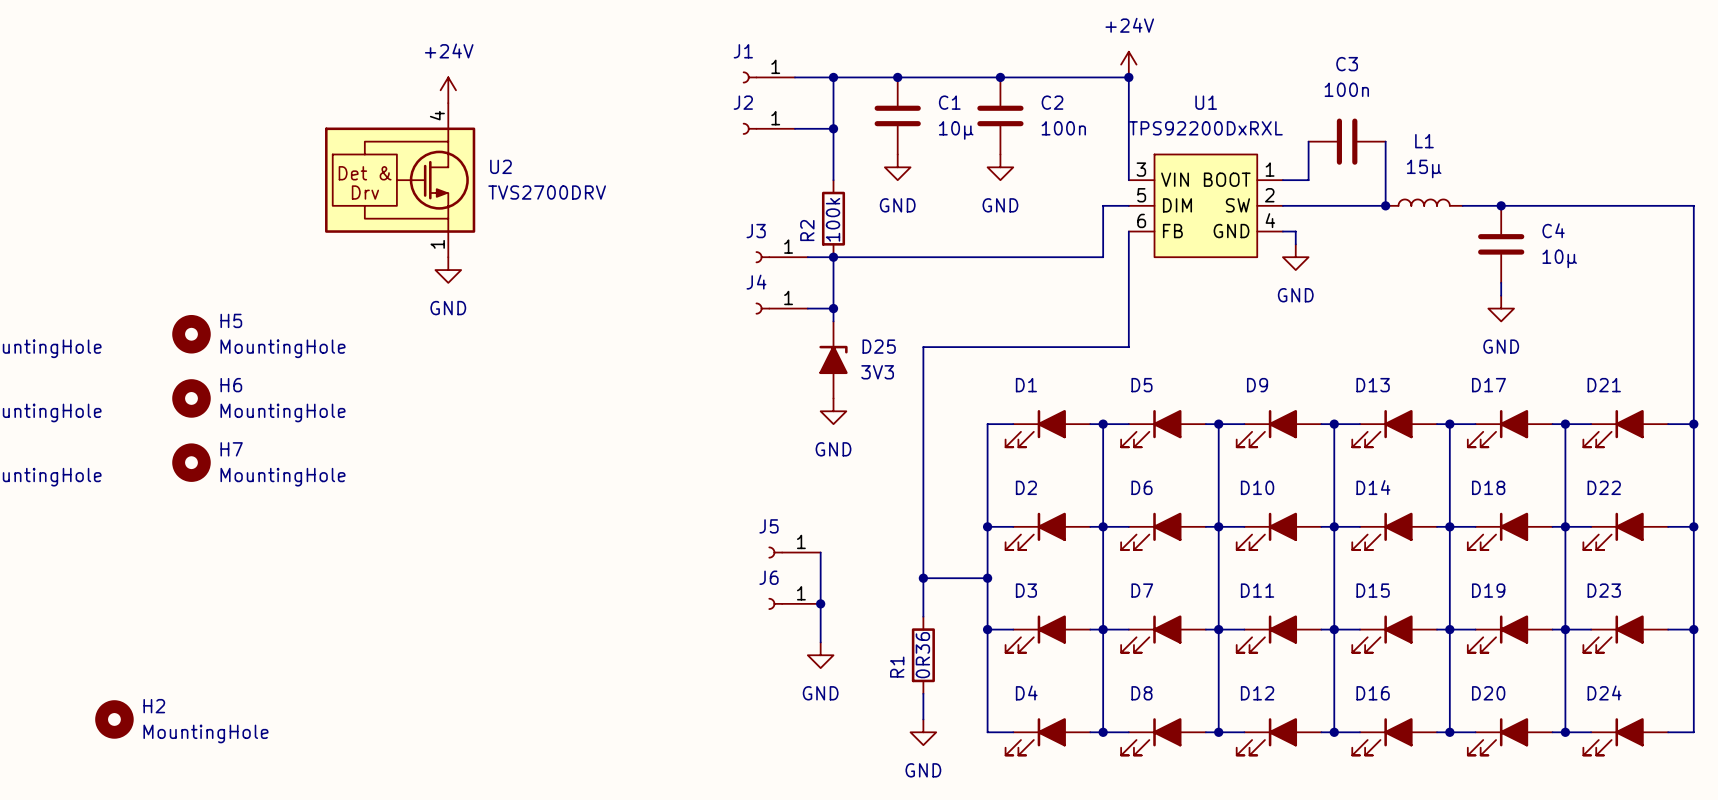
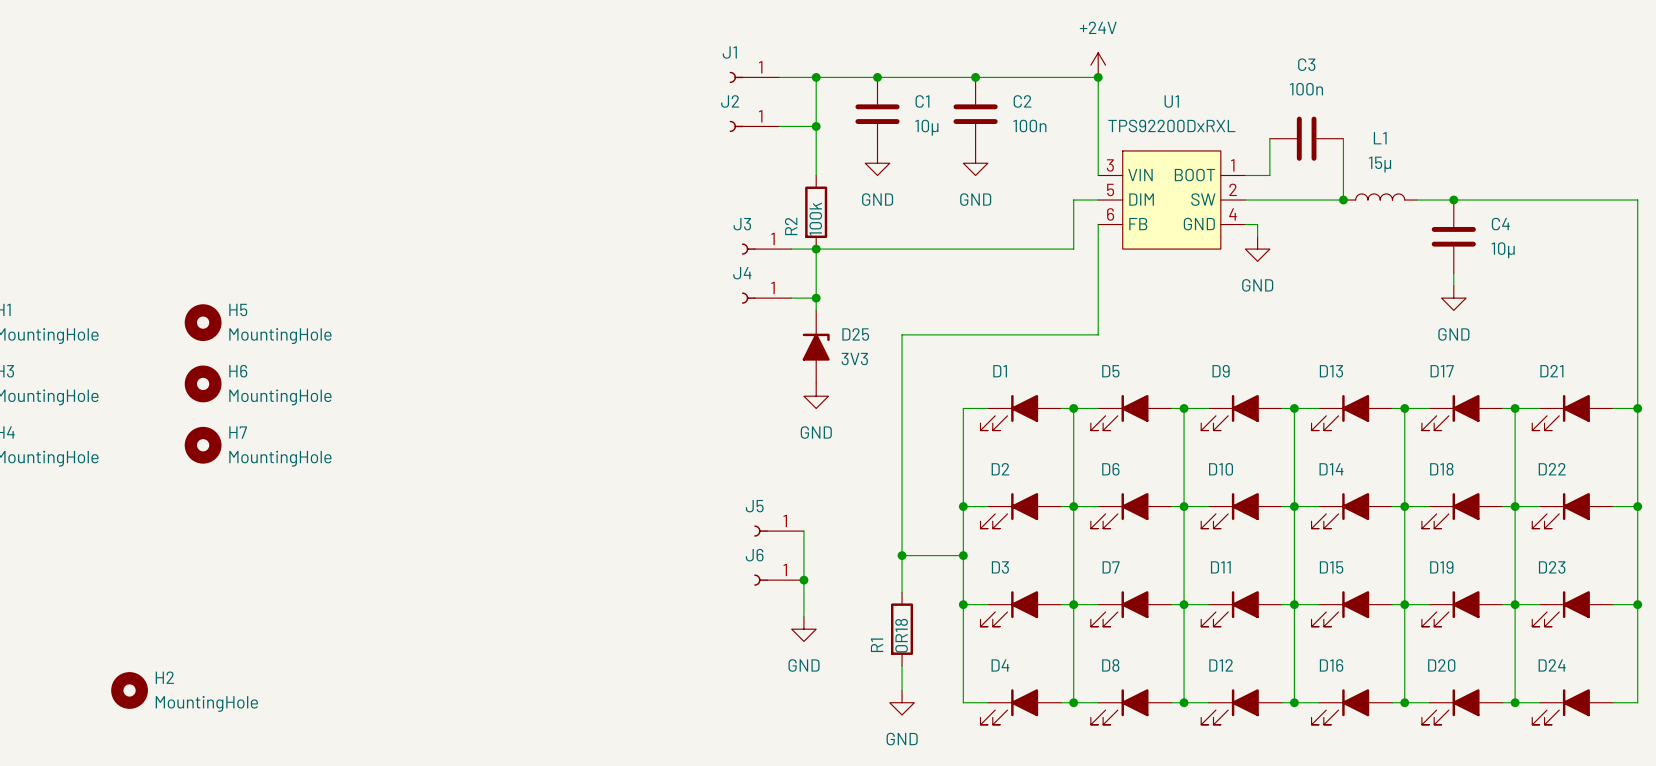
power symbol: +24V (448, 90) -> none
U2: TVS2700DRV (400, 180) -> none
power symbol: GND (448, 270) -> none
R1 value: 0R36 (922, 655) -> 0R18 (901, 635)

